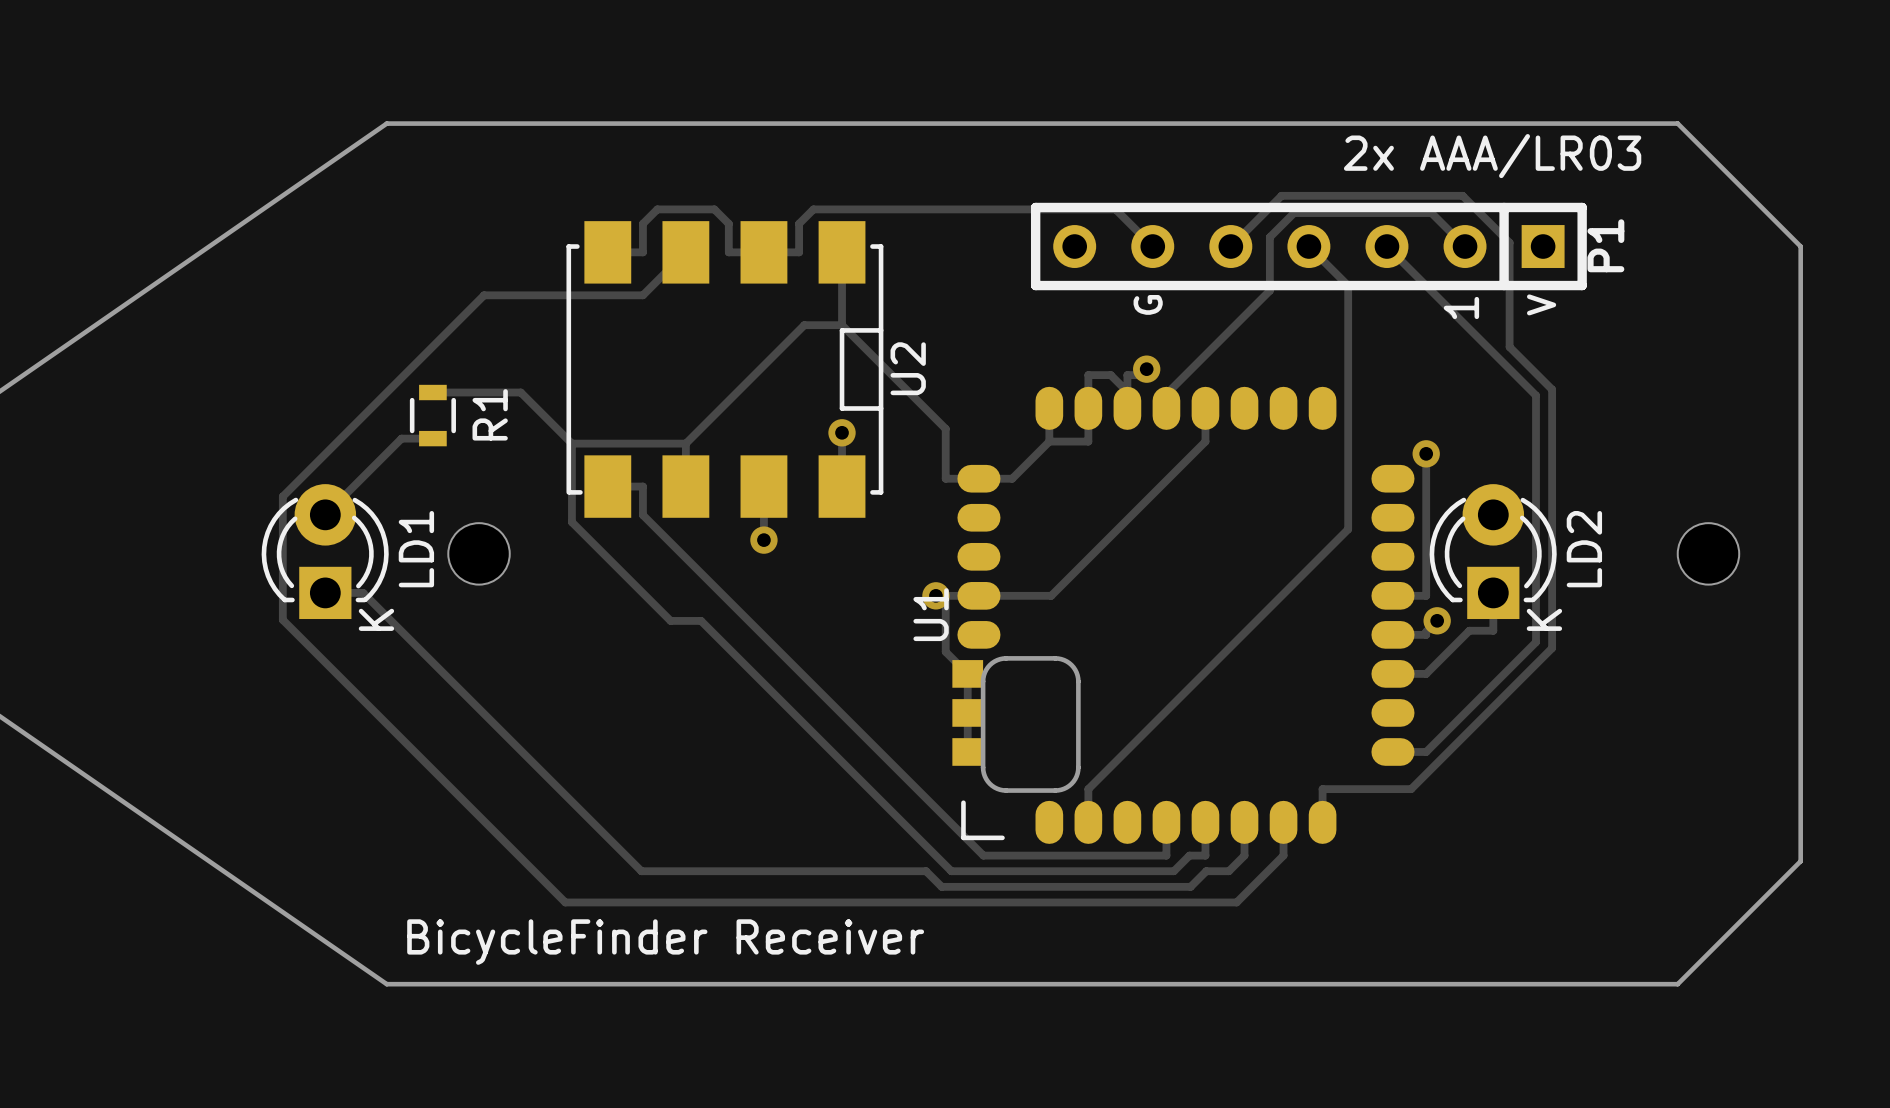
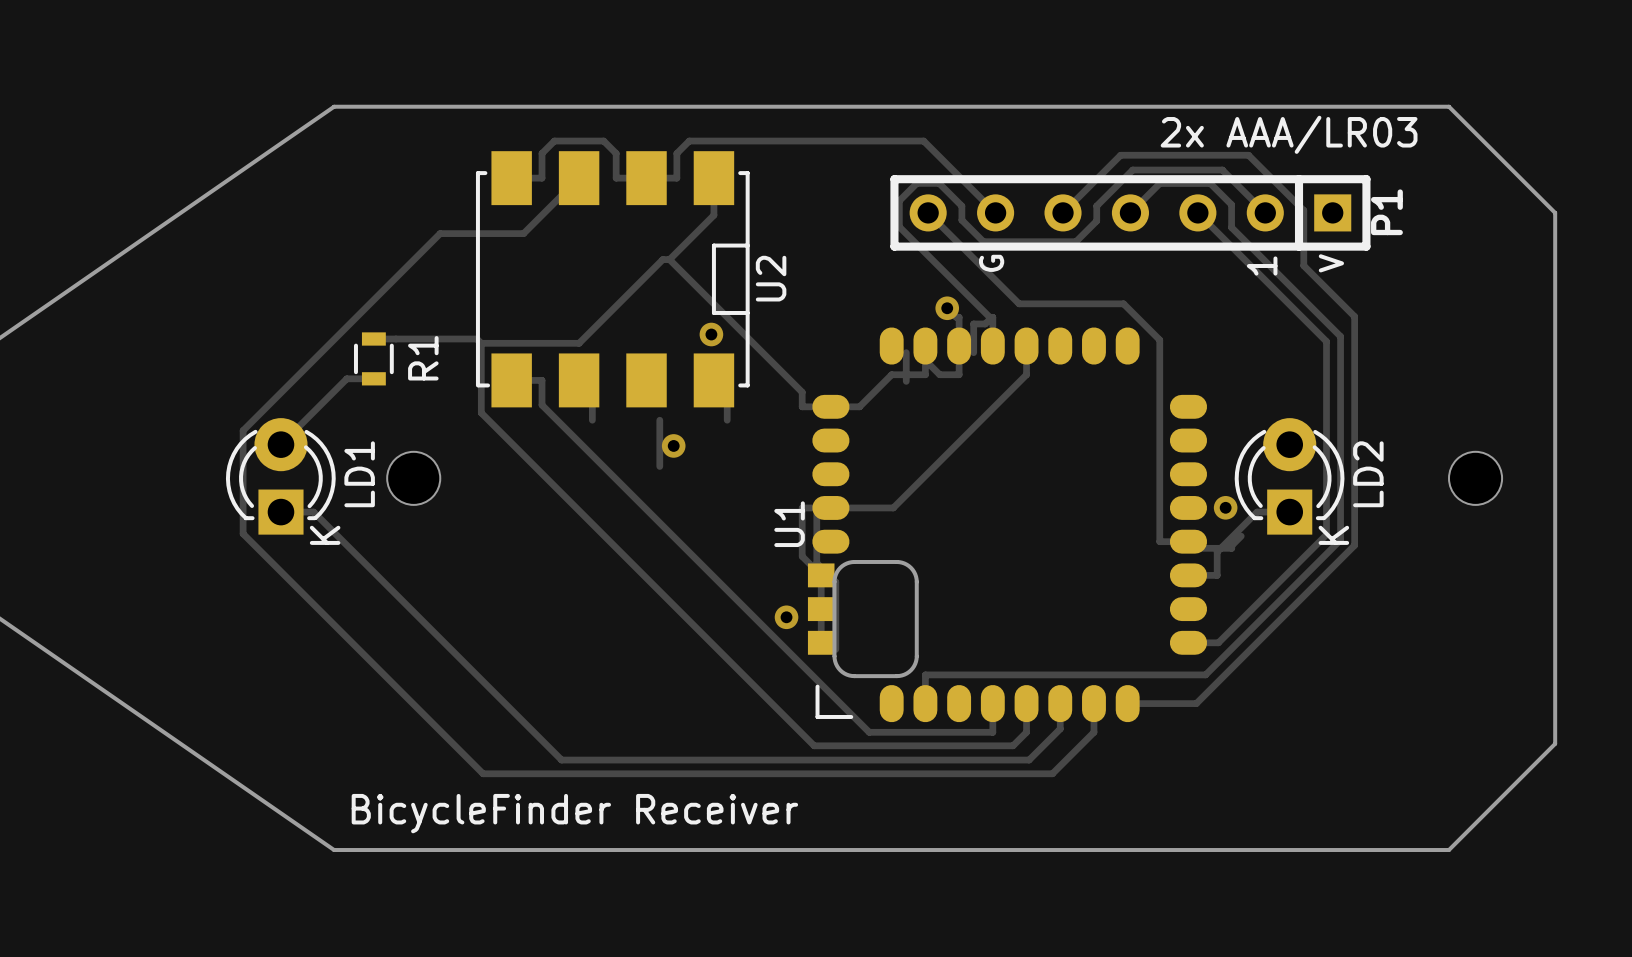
track: (1281, 195) (1462, 195) (1509, 243) -> (1106, 169) (1120, 155) (1248, 155) (1303, 210)
track: none -> (579, 178) (523, 233) (440, 233) (243, 430) (243, 533) (483, 773) (1052, 773) (1093, 732) (1093, 703)
track: none -> (713, 178) (713, 215) (669, 259)
track: (1115, 209) (813, 209) (799, 223) (799, 252) (728, 252) (728, 223) (714, 209) (657, 209) (642, 223) (642, 252) (607, 252) -> (963, 180) (923, 141) (689, 141) (676, 153) (676, 178) (616, 178) (616, 153) (603, 141) (554, 141) (542, 153) (542, 178) (511, 178)
track: (1431, 213) (1294, 213) (1269, 238) -> (1236, 184) (1222, 170) (1132, 170) (1096, 206)
track: none -> (928, 212) (1019, 303) (1123, 303) (1159, 340) (1159, 541) (1188, 541)
track: (1308, 246) (1348, 285) (1348, 529) (1088, 789) (1088, 822) -> none
track: (685, 252) (642, 295) (484, 295) (282, 496) (282, 619) (565, 902) (1236, 902) (1283, 855) (1283, 822) -> none
track: (842, 252) (842, 325) -> none
track: (1269, 255) (1269, 290) (1166, 394) (1166, 408) -> (1096, 220) (1076, 241) (983, 241) (961, 220) (961, 206) (939, 183) (916, 183) (899, 200) (899, 226) (989, 317) (992, 317) (992, 346)
track: none -> (669, 259) (662, 259) (579, 343) (481, 343)
track: none -> (669, 259) (802, 392) (802, 406) (859, 406) (891, 374) (925, 374) (925, 346)
track: (1509, 307) (1509, 347) -> (1130, 212) (1159, 183) (1210, 183) (1231, 204) (1231, 227) (1303, 299)
track: none -> (1303, 265) (1354, 316) (1354, 545) (1196, 703) (1127, 703)
track: (842, 325) (804, 325) (685, 443) (571, 443) -> none
track: (842, 325) (945, 428) (945, 478) (1012, 478) (1049, 441) (1088, 441) (1088, 375) (1110, 375) (1127, 391) -> none
track: none -> (947, 308) (956, 317) (959, 317) (959, 374) (939, 374) (925, 360)
U2 position: (724, 369) -> (612, 279)
via position: (1146, 369) -> (947, 308)
track: (1552, 389) (1552, 648) (1411, 789) (1322, 789) (1322, 822) -> (1340, 336) (1340, 539) (1205, 674) (925, 674) (925, 703)
track: (520, 392) (571, 443) -> (449, 339) (476, 339) (481, 343)
track: none -> (481, 343) (481, 412) (814, 745) (1013, 745) (1026, 732) (1026, 703)
track: none -> (1026, 346) (1026, 374) (893, 507) (802, 507) (802, 556) (821, 575) (821, 642)
track: (1205, 408) (1205, 441) (1051, 595) (935, 595) -> none
via position: (842, 432) -> (711, 334)
track: none -> (511, 380) (542, 380) (542, 405) (869, 732) (992, 732) (992, 703)
track: (571, 443) (571, 522) (670, 620) (701, 620) (951, 871) (1173, 871) (1189, 855) (1205, 855) (1205, 822) -> none
track: (1426, 453) (1426, 595) (1392, 595) -> none
via: (1426, 453) -> none
track: (607, 486) (642, 486) (642, 515) (983, 855) (1166, 855) (1166, 822) -> none
via position: (763, 540) -> (673, 445)
track: (1493, 592) (1493, 630) (1469, 630) (1426, 673) (1392, 673) -> (1289, 512) (1257, 512) (1217, 551) (1217, 575) (1188, 575)
via: (935, 595) -> none
U1 position: (1183, 615) -> (1007, 524)
track: (1535, 619) (1536, 642) (1426, 751) (1392, 751) -> (1326, 534) (1218, 642) (1188, 642)
via position: (1437, 620) -> (1225, 507)
via: none -> (786, 617)
track: (1244, 822) (1244, 855) (1228, 871) (1206, 871) (1190, 886) (941, 886) (926, 871) (641, 871) -> (1060, 703) (1060, 728) (1029, 760) (561, 760) (554, 752)

